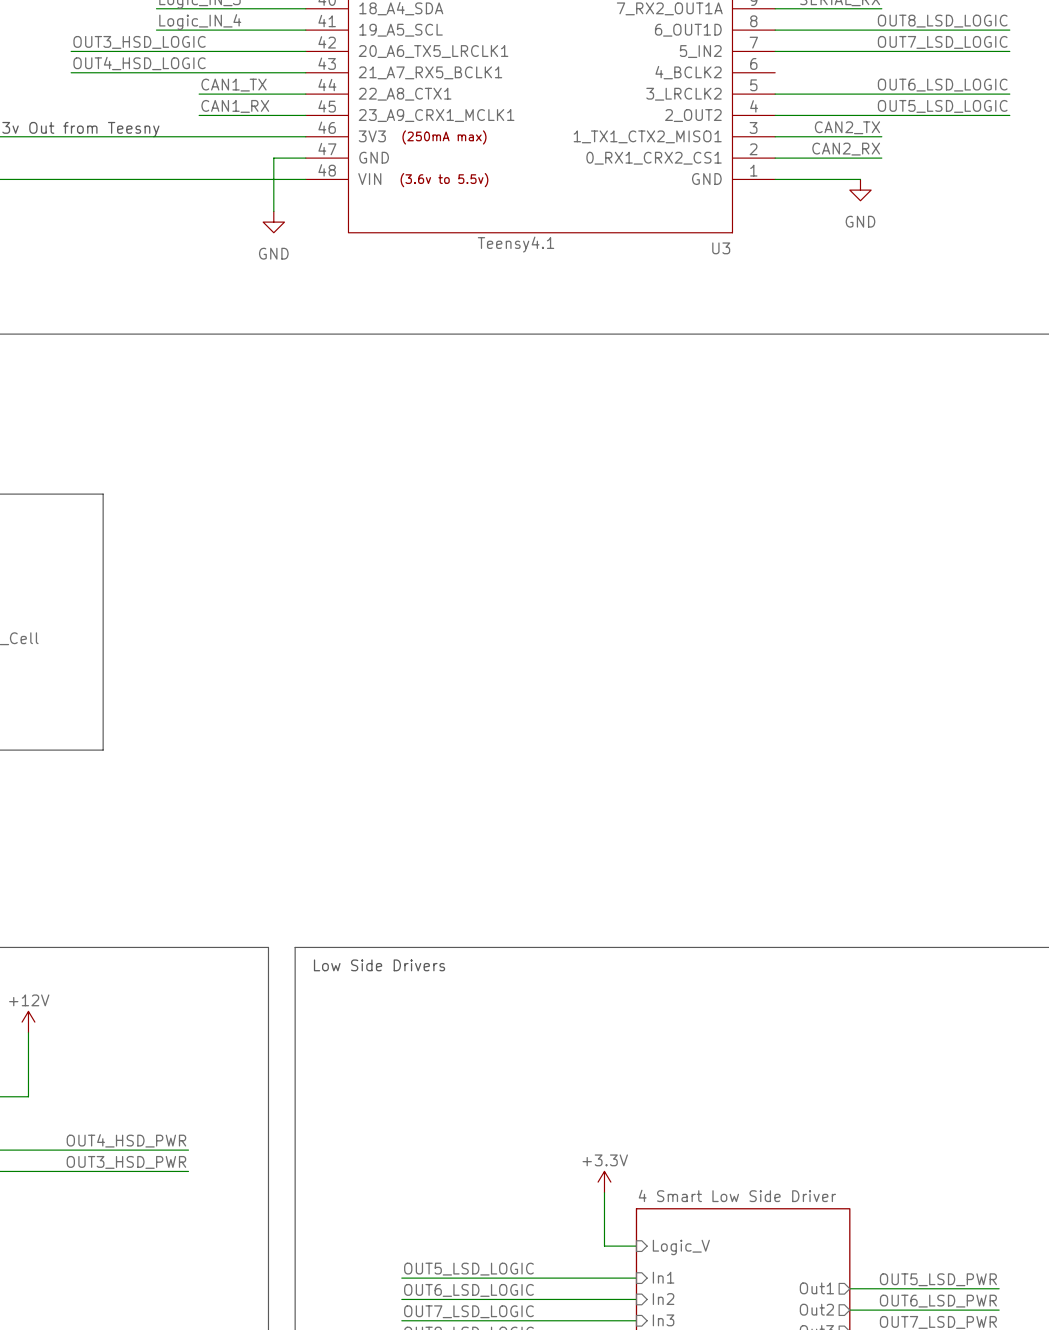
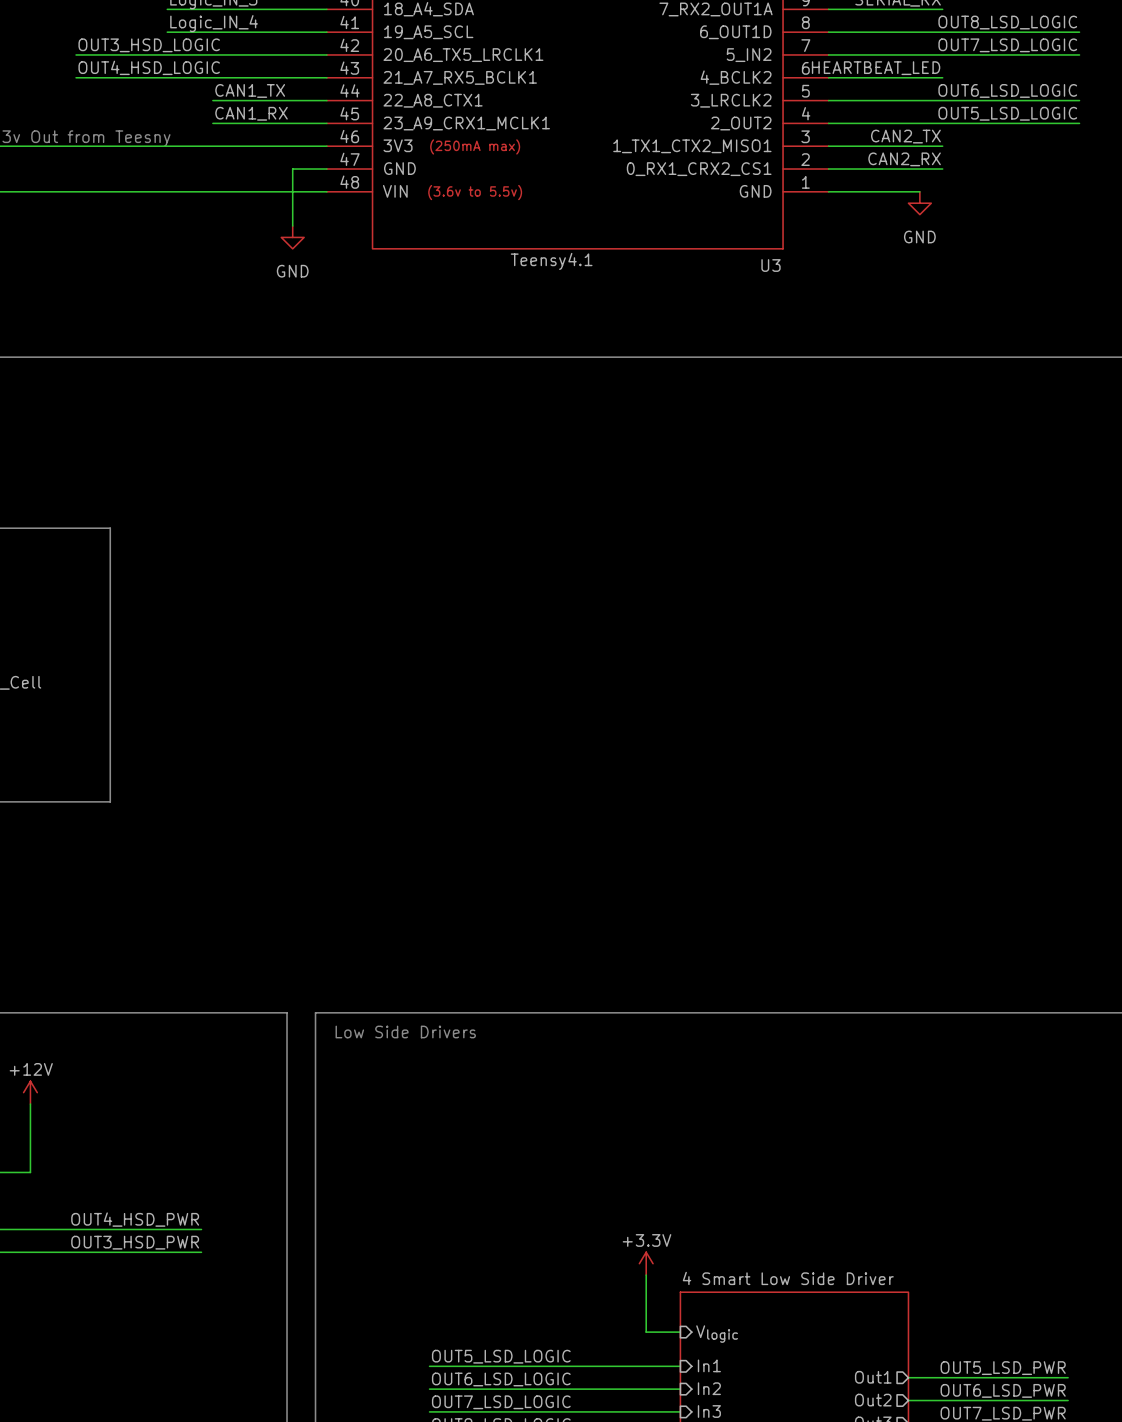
label: none -> HEARTBEAT_LED (876, 68)
wire: none -> (828, 77) (942, 77)
sheet pin: Logic_V (681, 1247) -> Vlogic (717, 1334)

